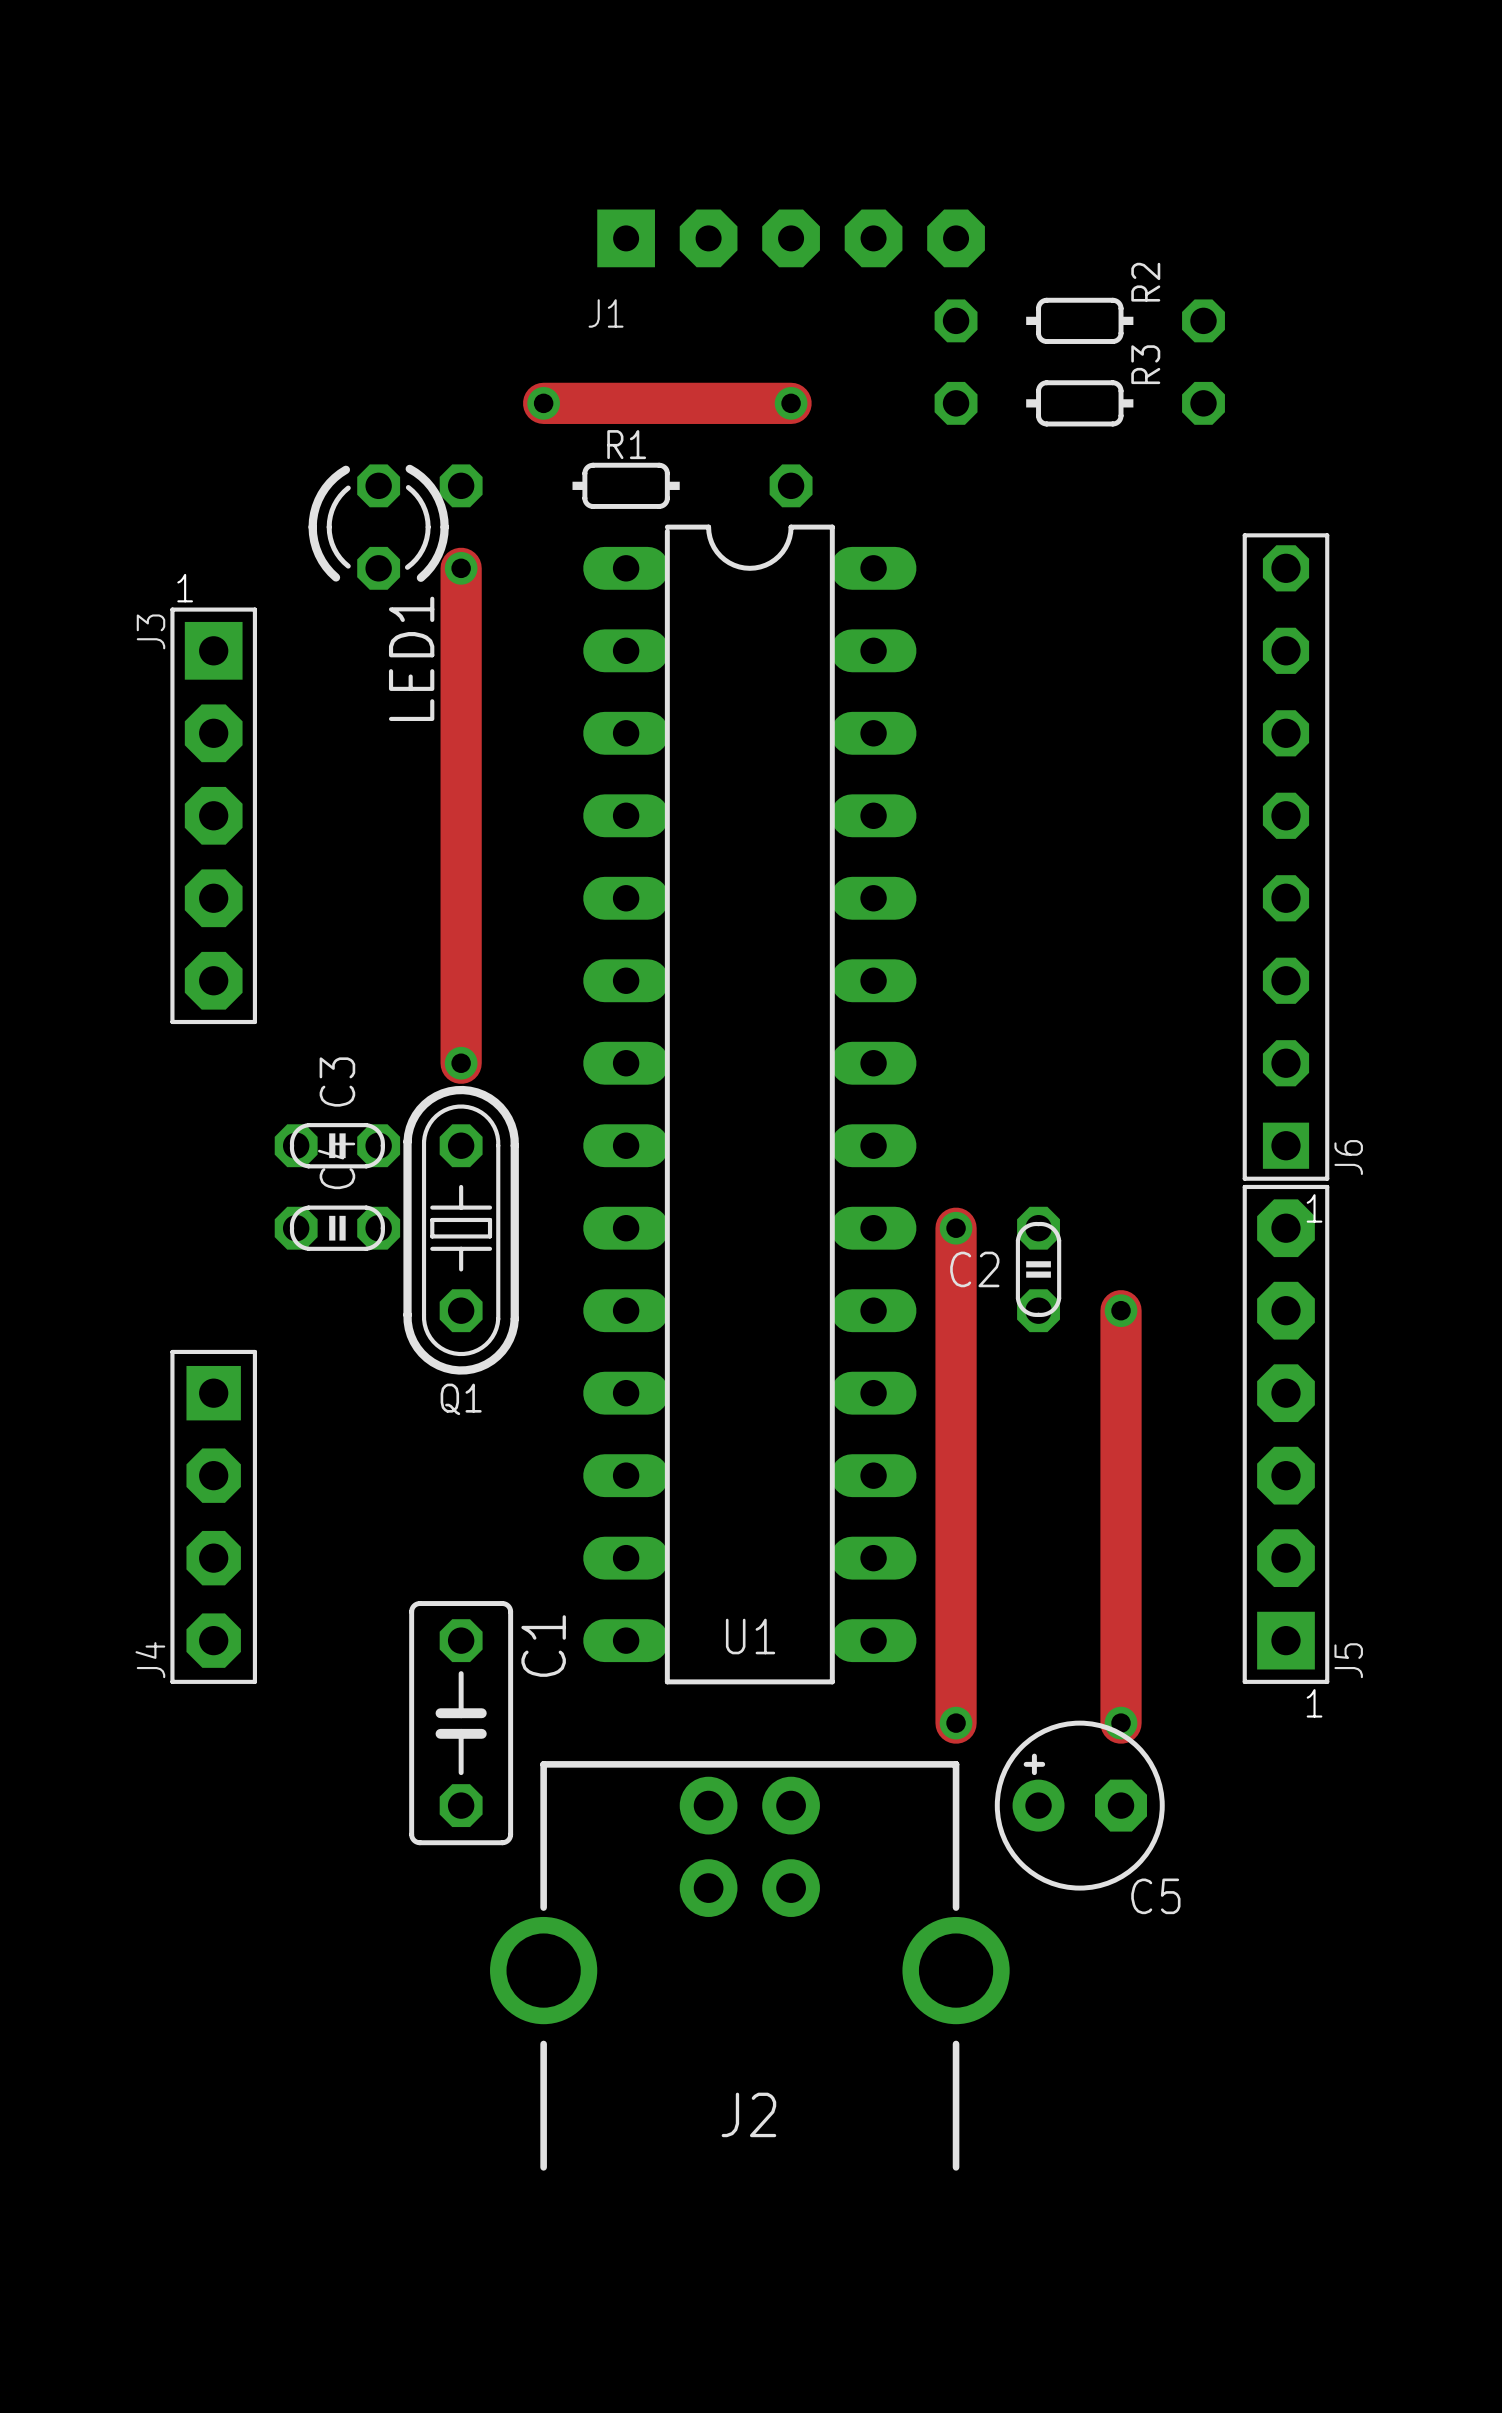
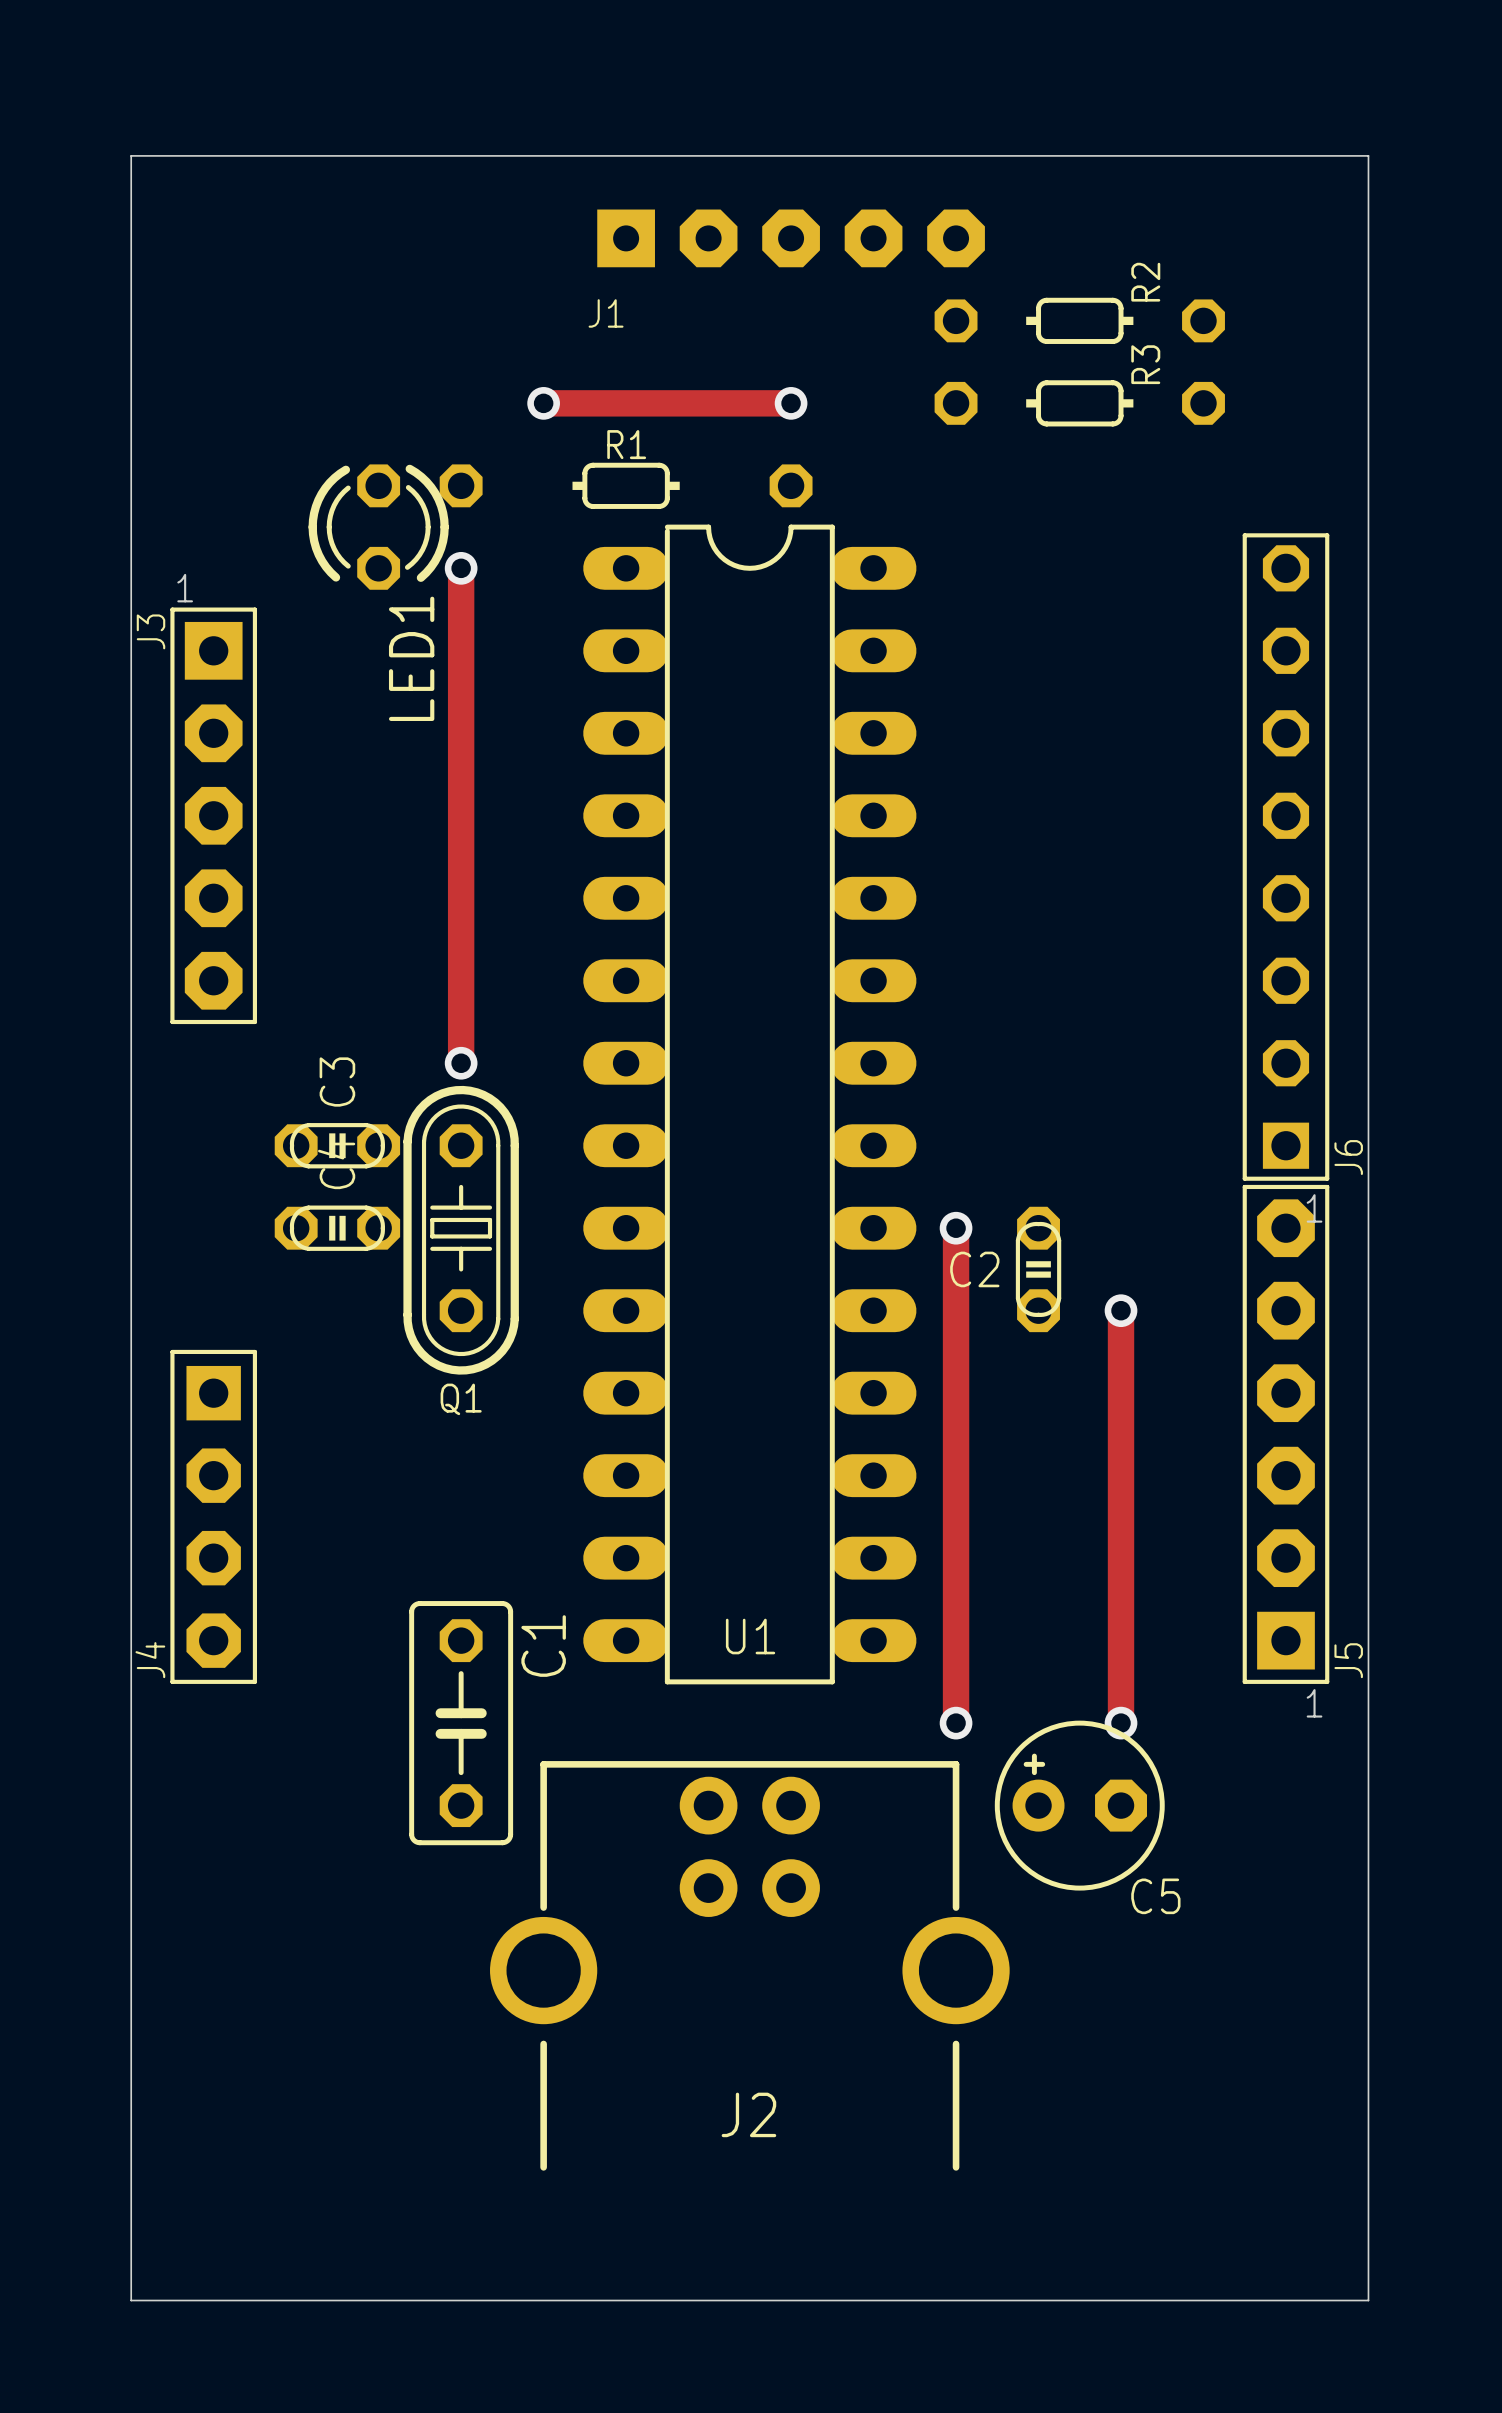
board edge: none -> (131, 155) (1368, 155) (1368, 2300) (131, 2300) (131, 155)
track width: thick (543, 403) (791, 403) -> thin (543, 403) (791, 403)
track width: thick (461, 568) (461, 1063) -> thin (461, 568) (461, 1063)
track width: thick (956, 1228) (956, 1723) -> thin (956, 1228) (956, 1723)
track width: thick (1121, 1310) (1121, 1723) -> thin (1121, 1310) (1121, 1723)

